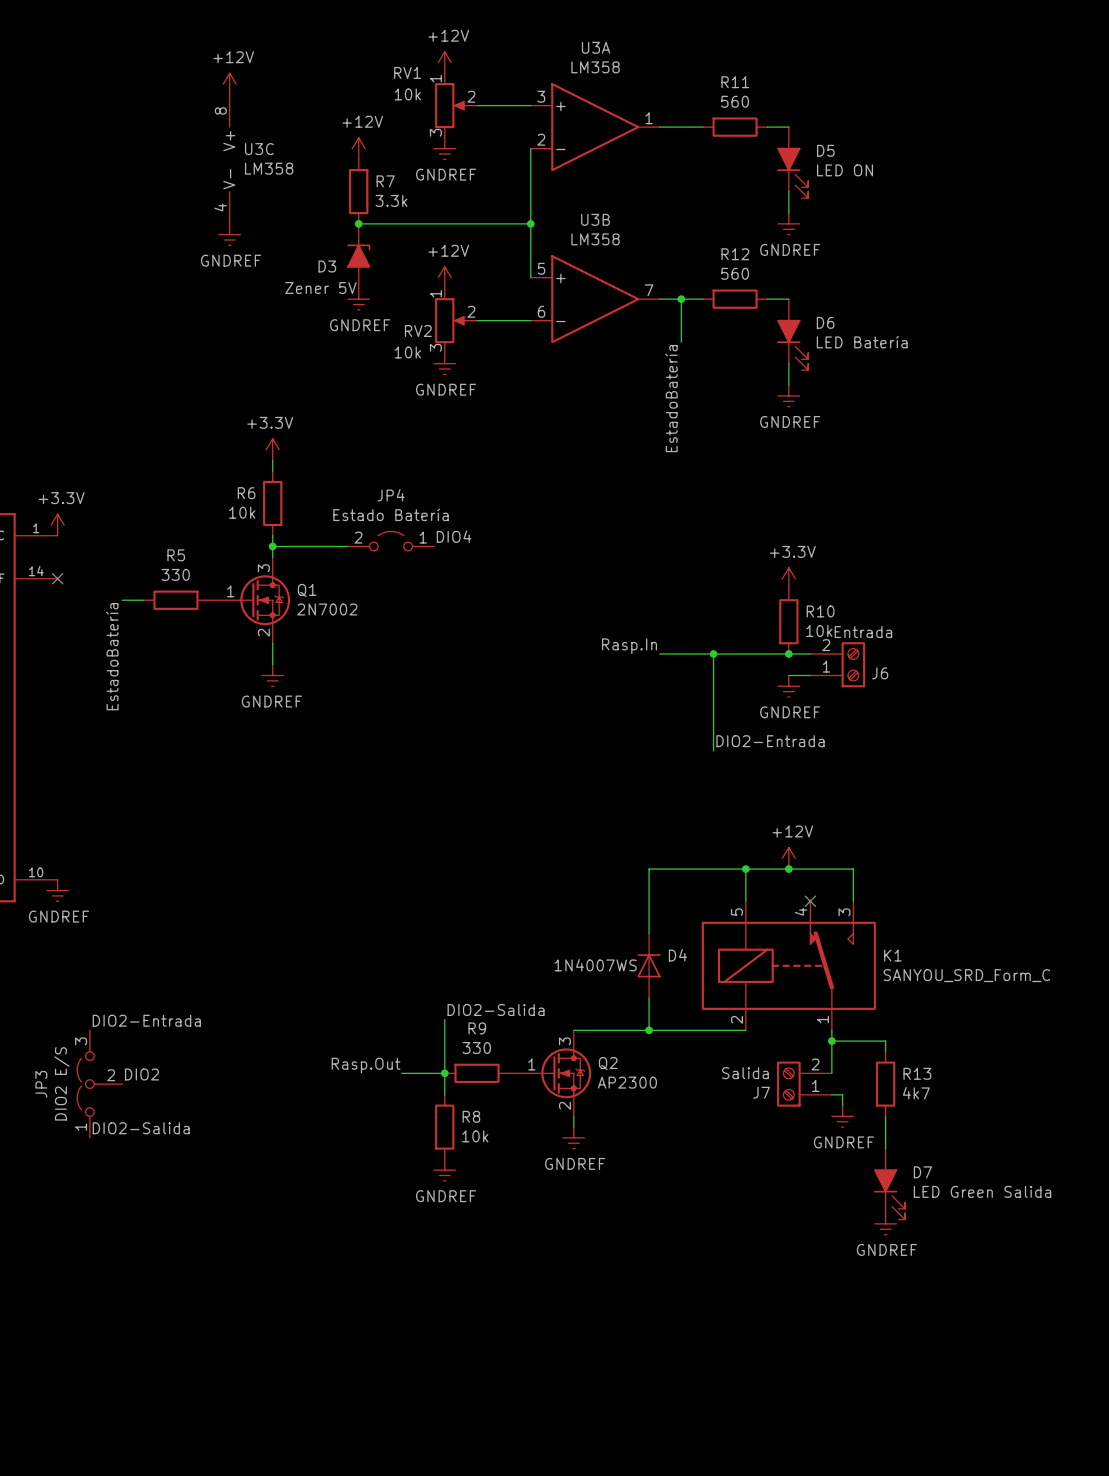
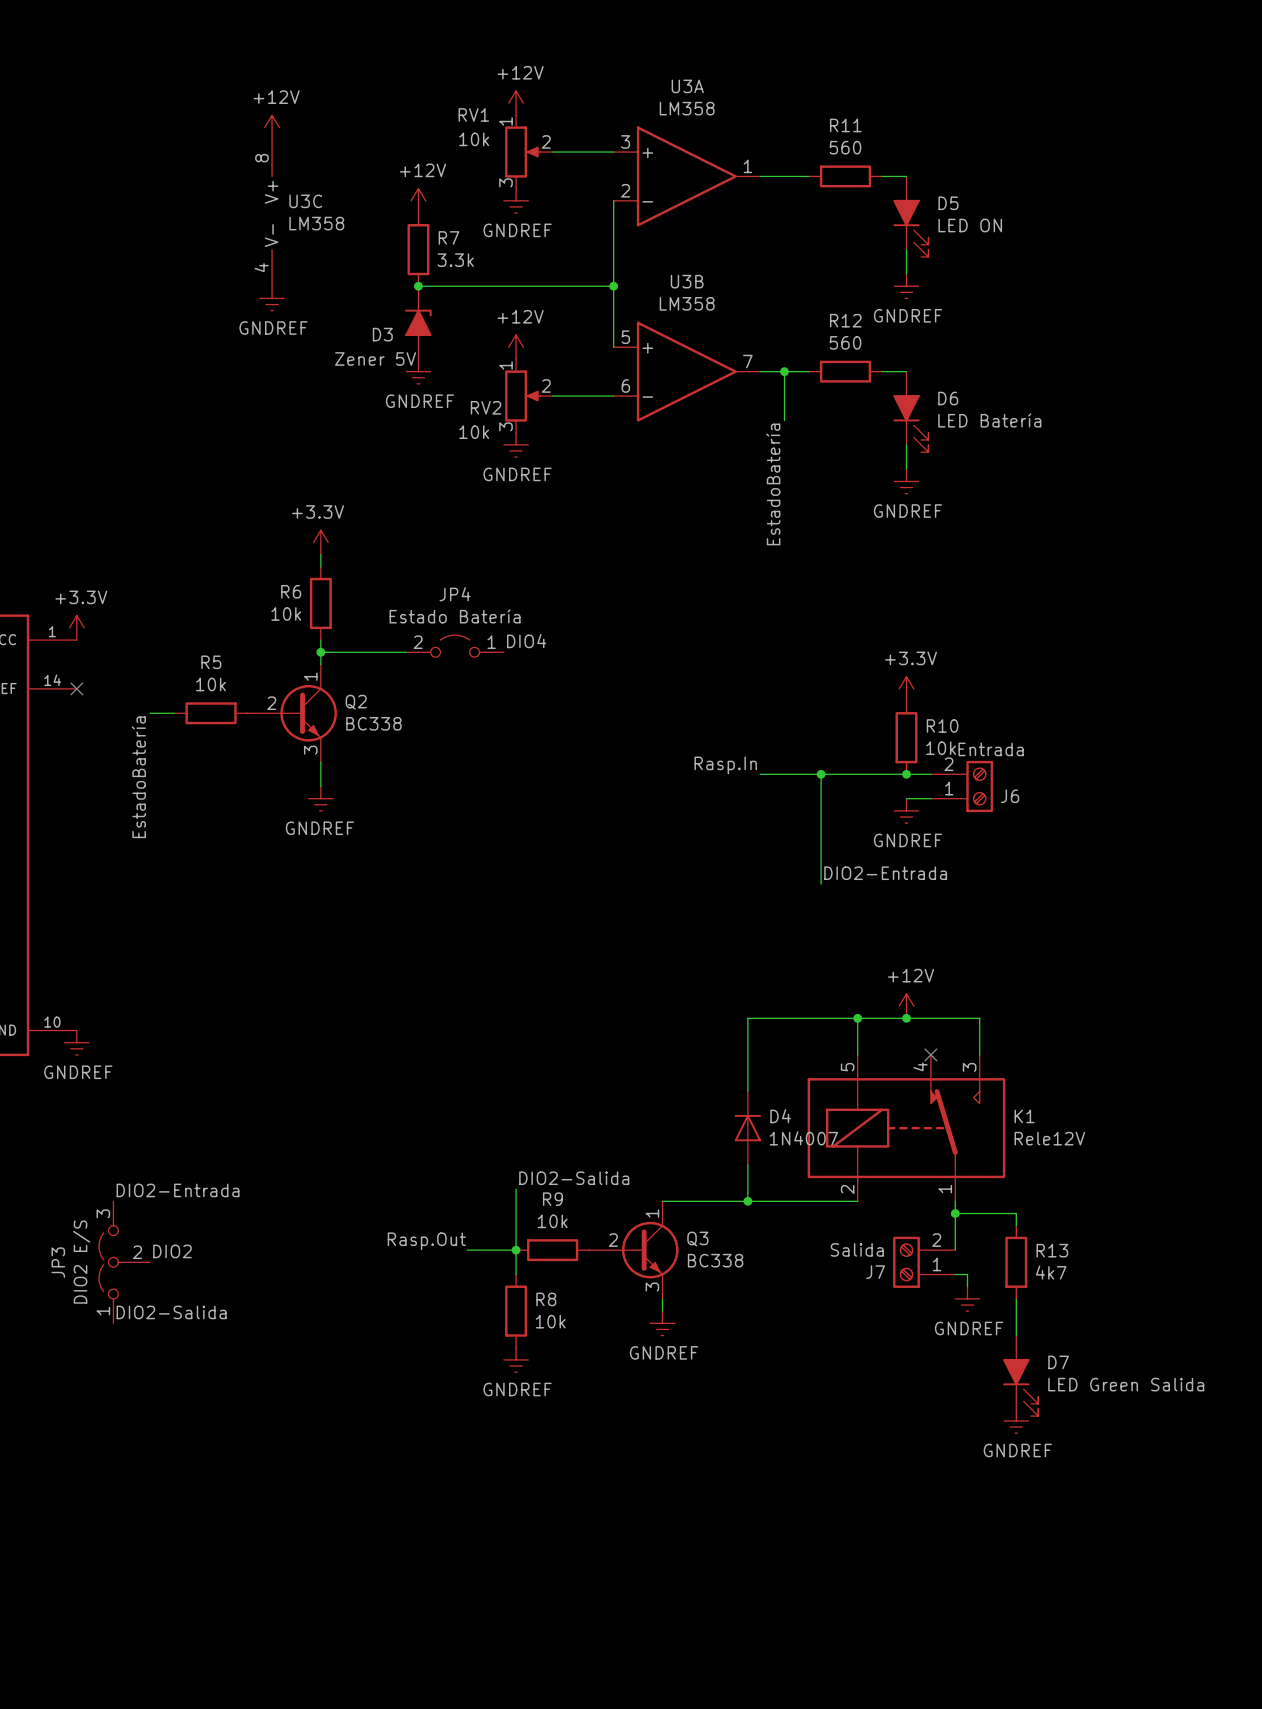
R5 value: 330 (175, 574) -> 10k (211, 684)
Q1: 2N7002 (249, 600) -> none
D4 value: 1N4007WS (595, 965) -> 1N4007 (803, 1138)
K1 value: SANYOU_SRD_Form_C (966, 975) -> Rele12V (1049, 1138)
Q2 symbol: [509, 1030, 592, 1117] -> [247, 664, 337, 763]
R9 value: 330 (476, 1048) -> 10k (552, 1221)
Q3: none -> BC338 (633, 1250)
Q2 value: AP2300 (627, 1082) -> BC338 (373, 723)

